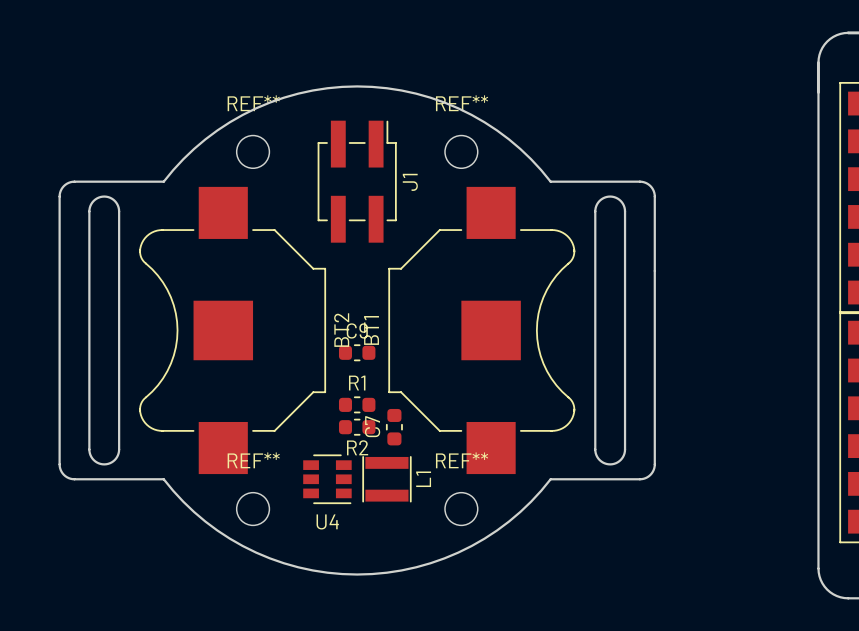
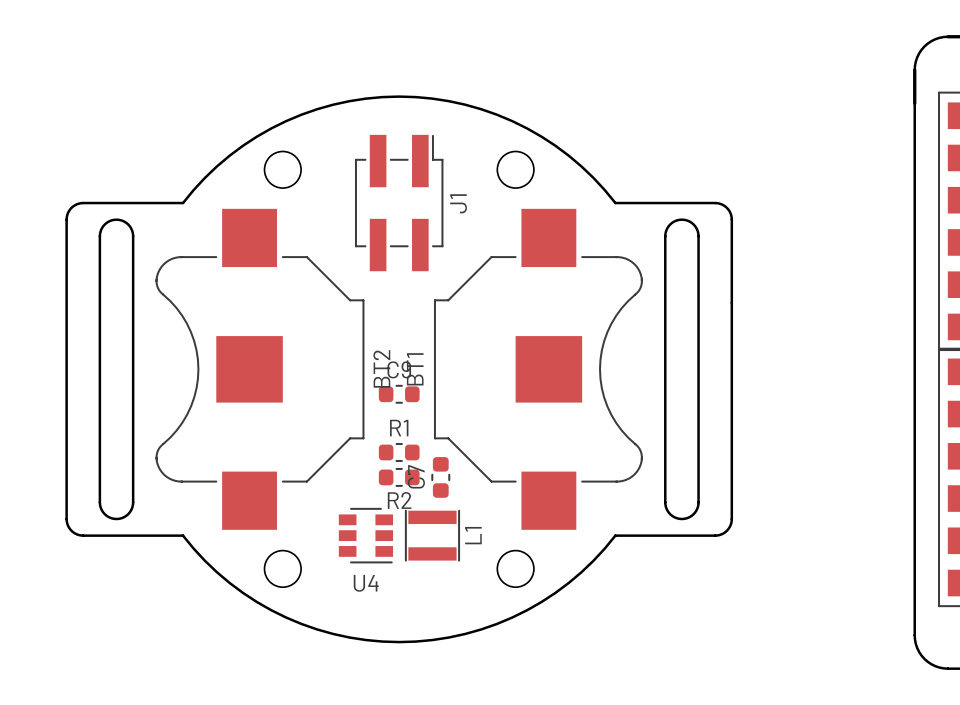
REF** name: REF** (253, 103) -> none
REF** name: REF** (462, 103) -> none
REF** name: REF** (253, 460) -> none
REF** name: REF** (462, 460) -> none

